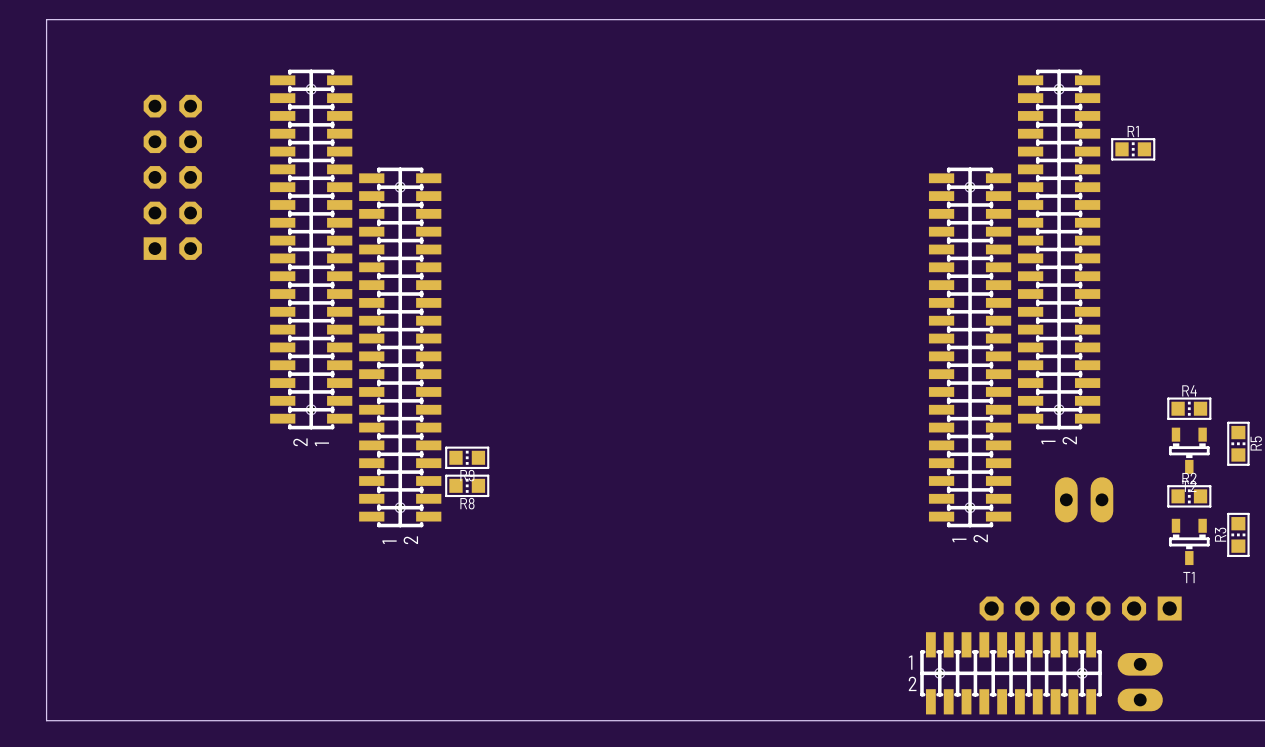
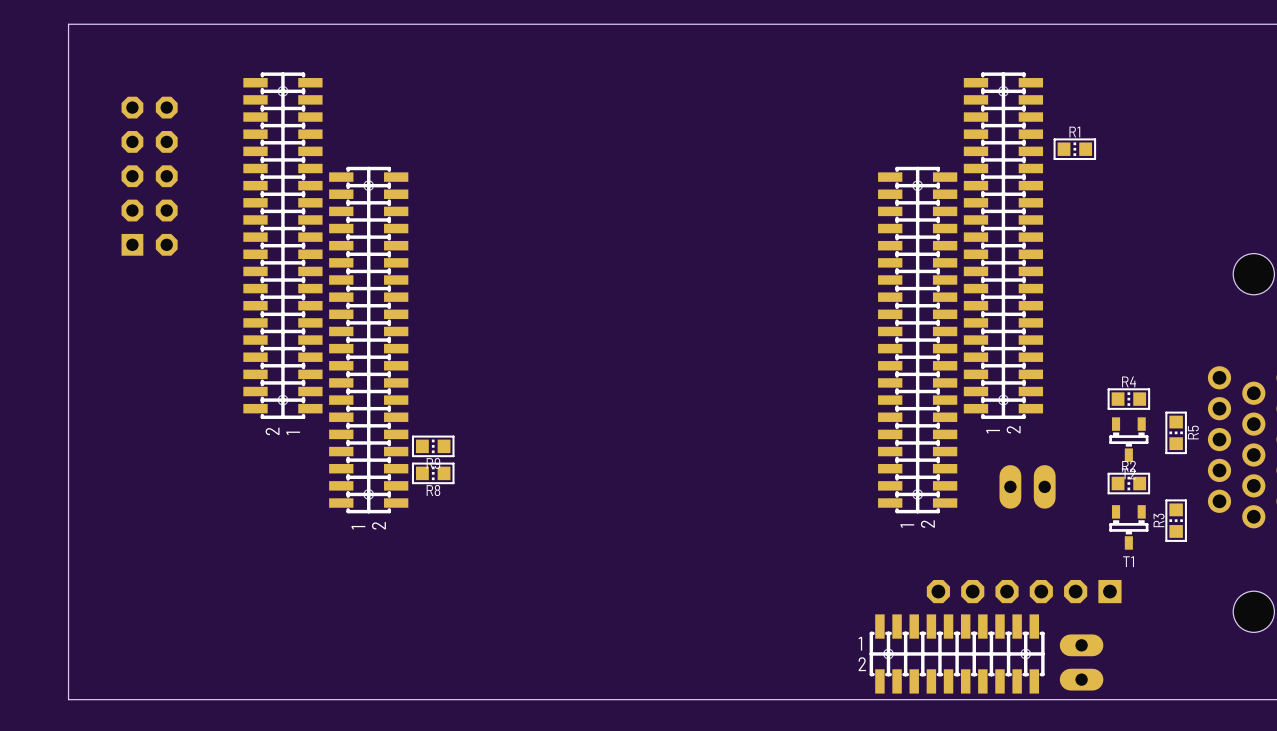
board edge: (88, 19) (46, 19) (46, 720) (88, 720) -> (68, 24) (68, 699)

